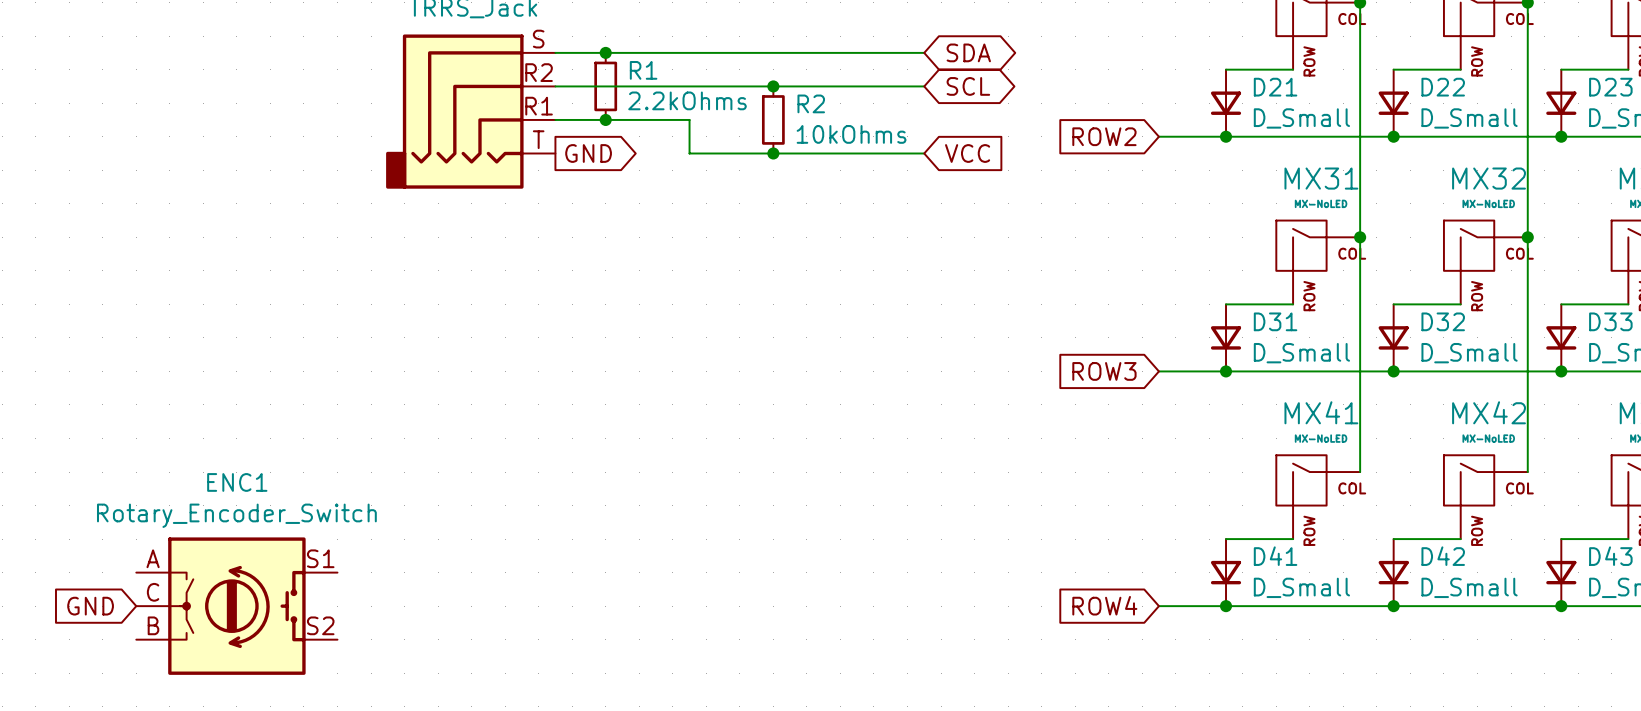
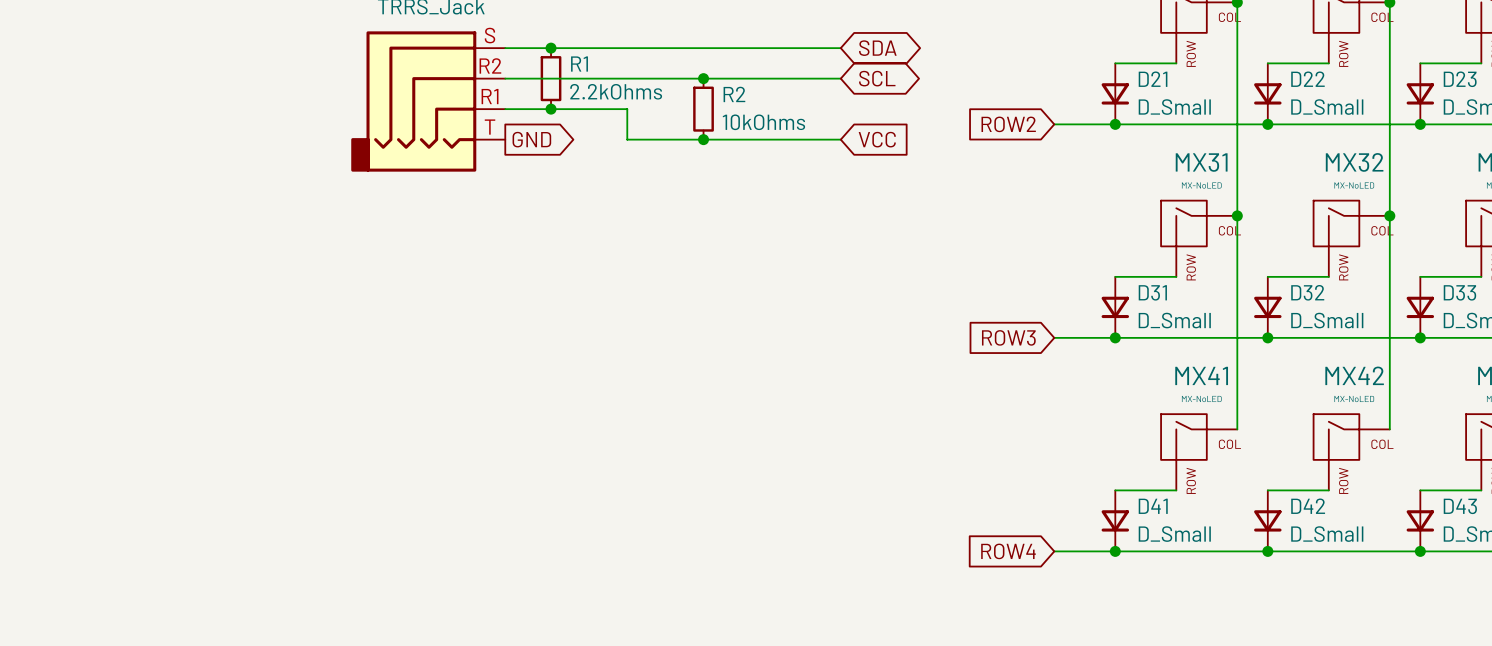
global label: GND (90, 606) -> none
ENC1: Rotary_Encoder_Switch (236, 606) -> none

